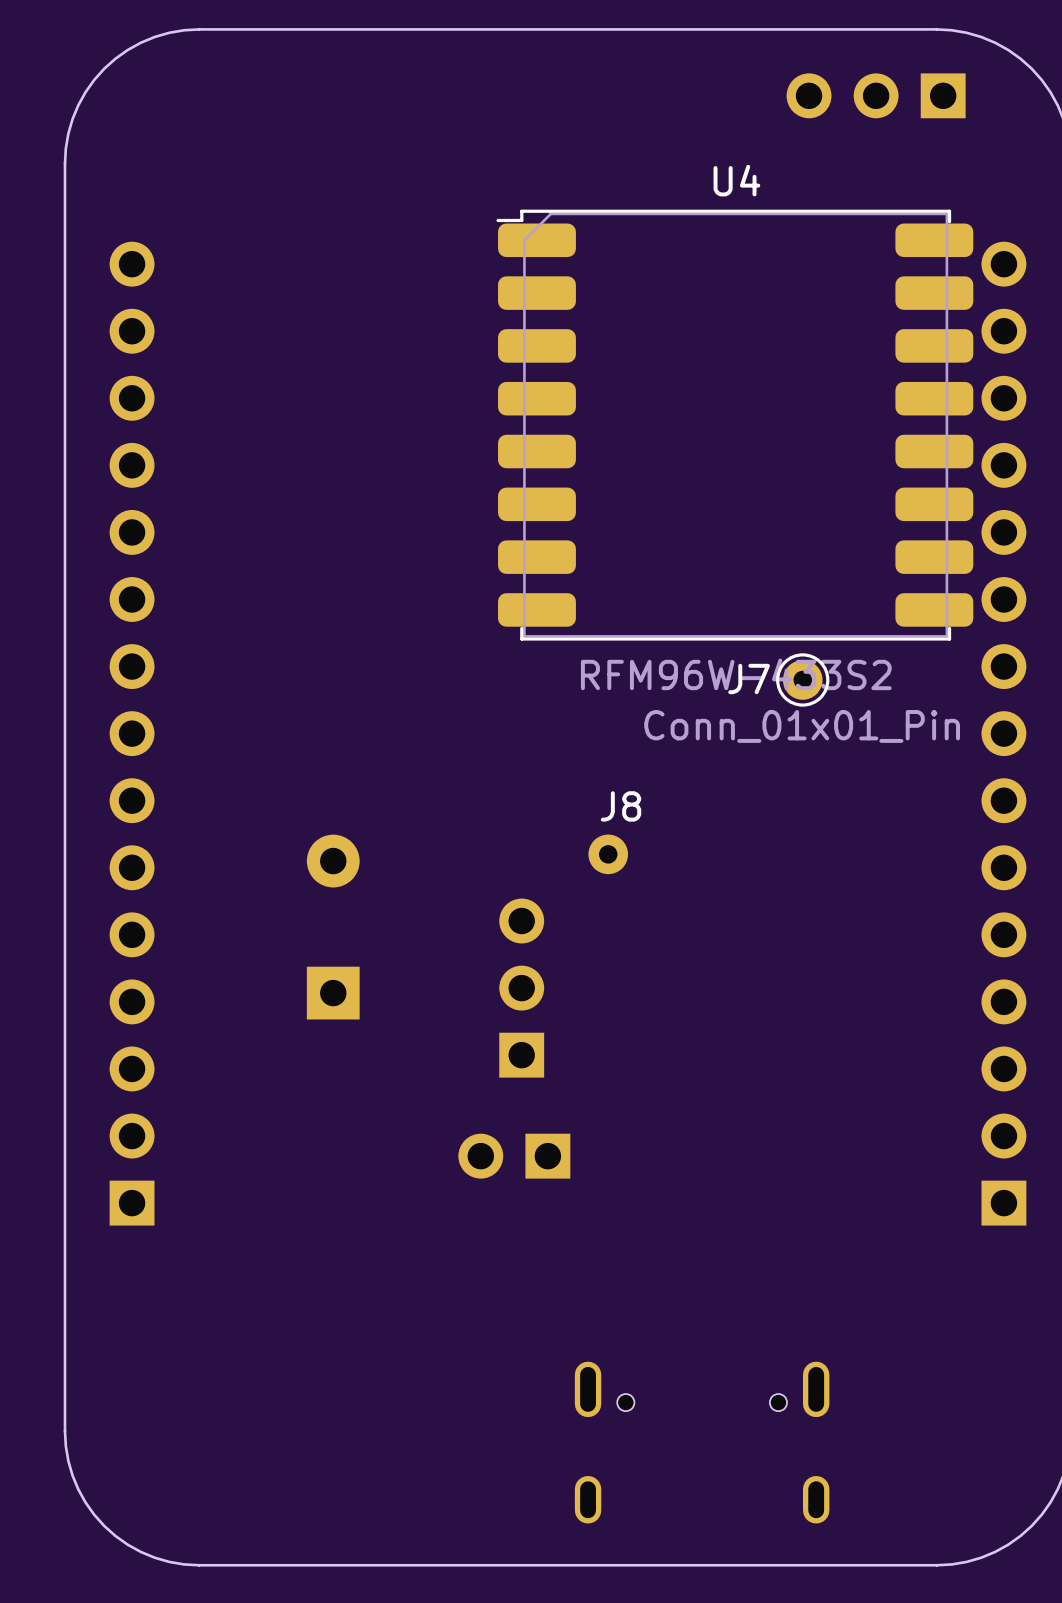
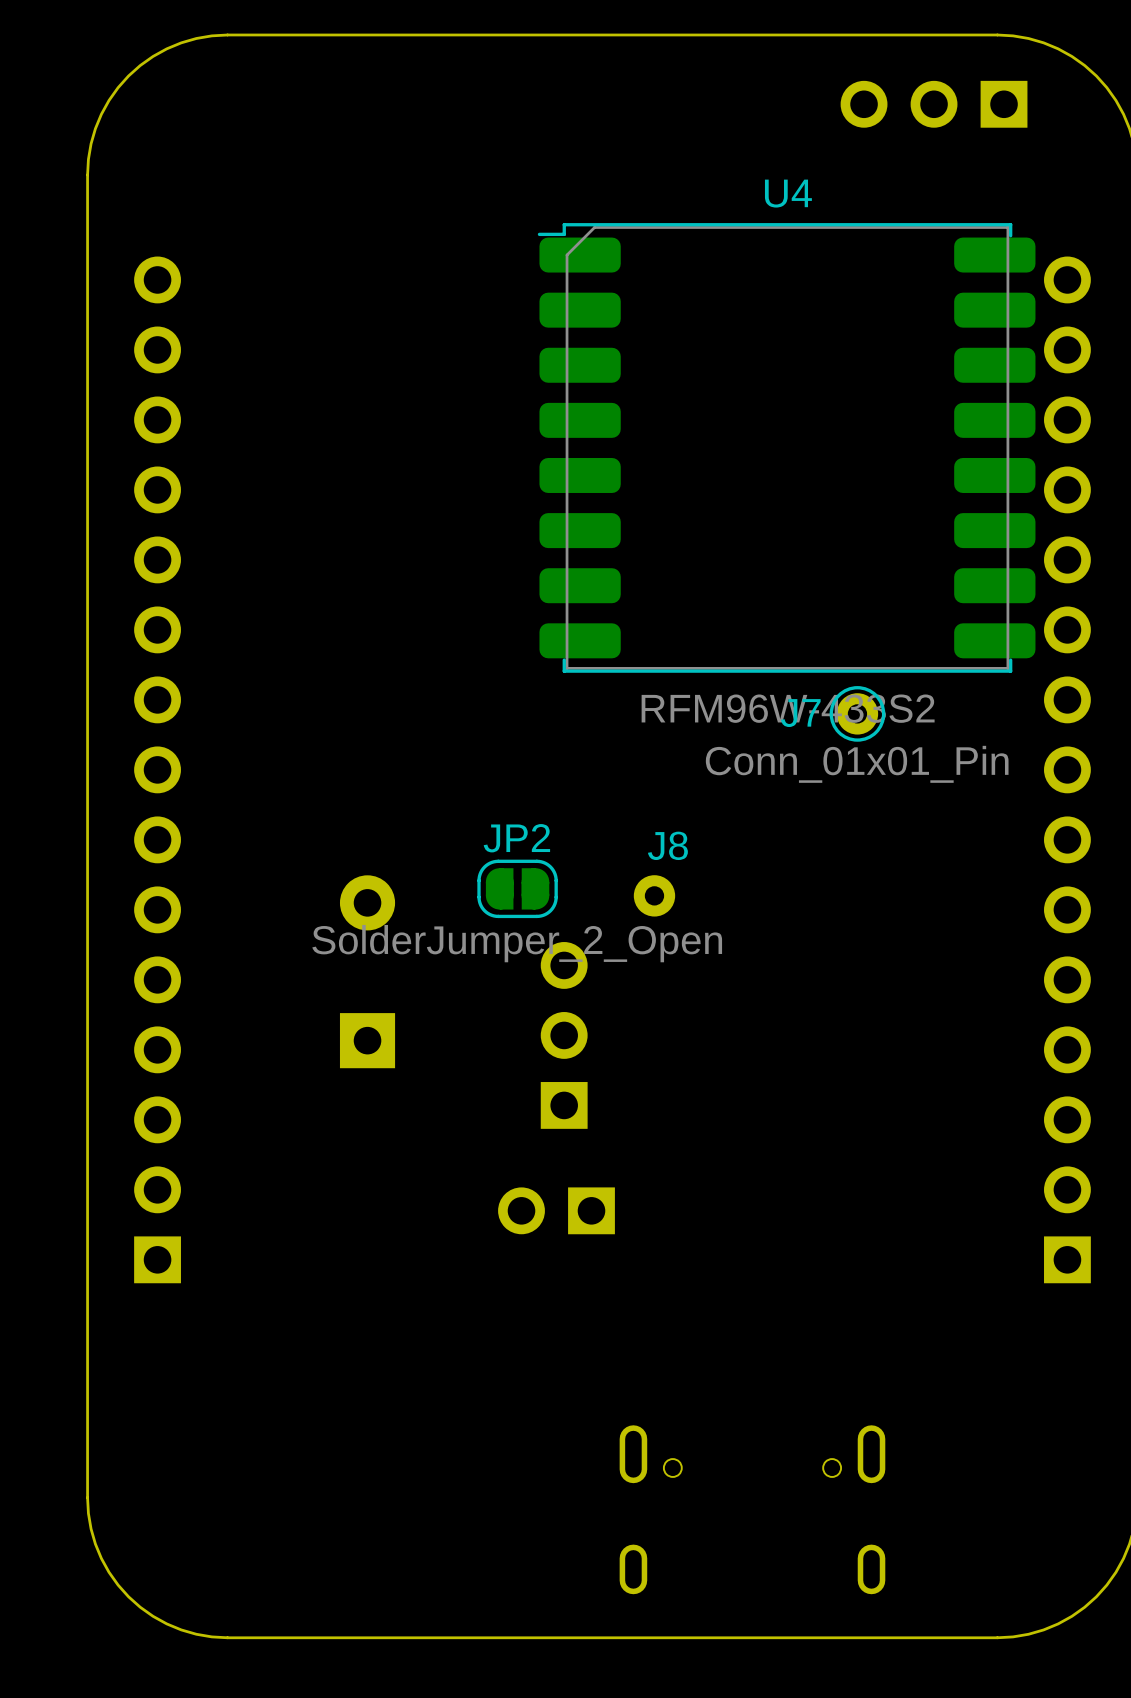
JP2: none -> SolderJumper_2_Open (517, 888)

